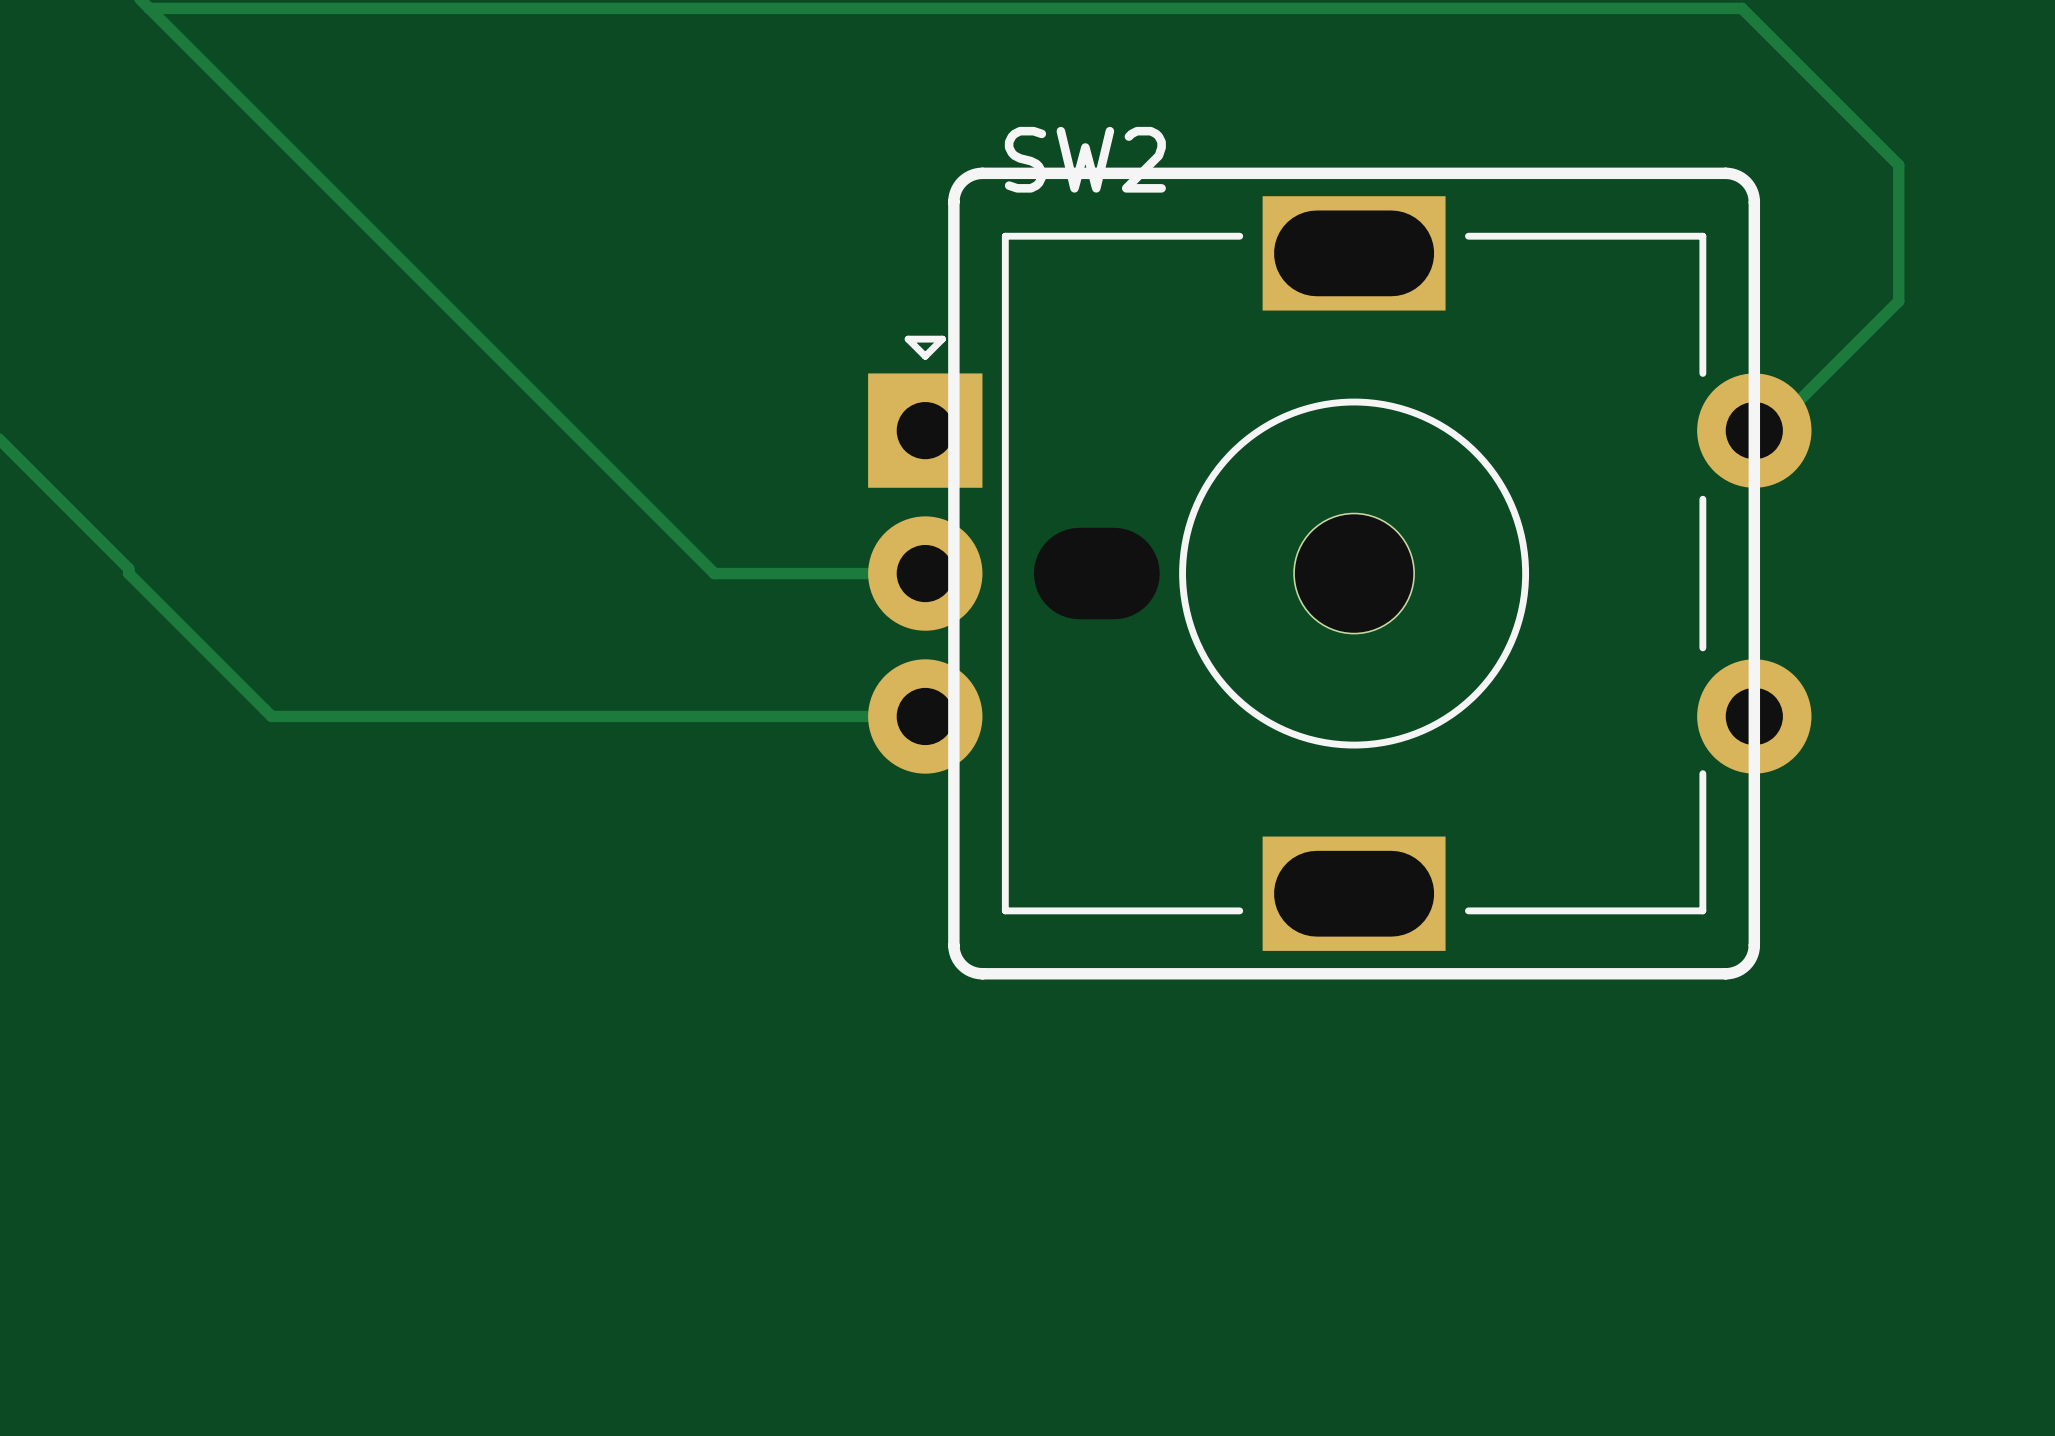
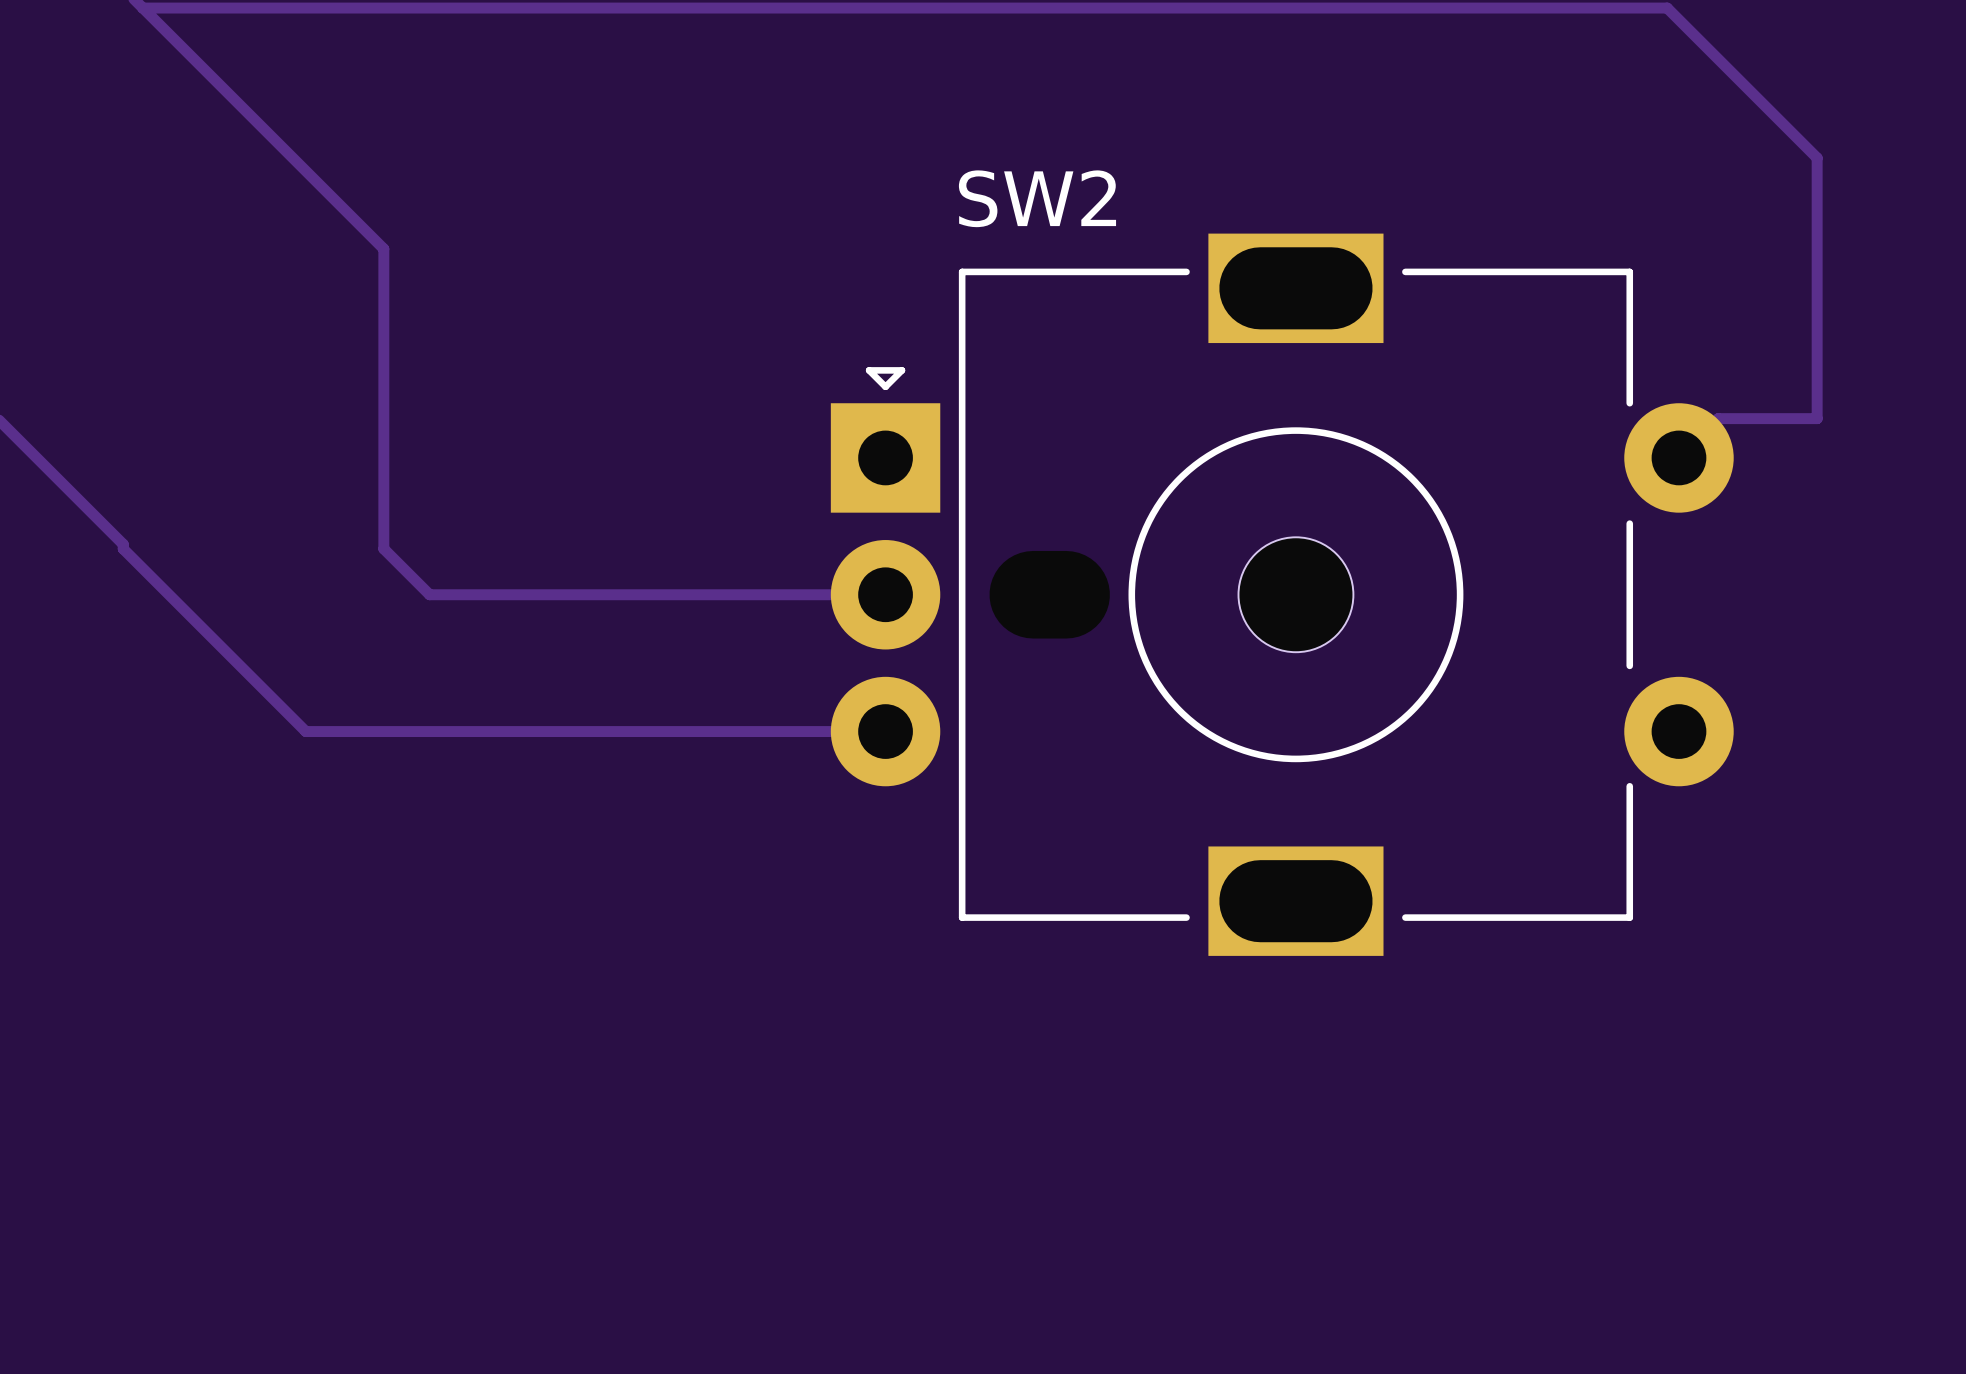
line: (982, 173) (1725, 173) (1735, 174) (1746, 181) (1751, 189) (1754, 202) (1754, 945) (1751, 957) (1745, 965) (1738, 970) (1725, 973) (982, 973) (971, 971) (962, 965) (956, 956) (953, 945) (953, 201) (956, 189) (962, 181) (970, 176) (982, 173) -> none
track: (401, 260) (714, 573) (925, 573) -> (383, 248) (383, 548) (429, 594) (885, 594)
track: (1898, 301) (1769, 430) (1754, 430) -> (1817, 288) (1817, 418) (1718, 418)
SW2 position: (1339, 573) -> (1282, 594)
track: (271, 716) (925, 716) -> (260, 685) (305, 731) (885, 731)

